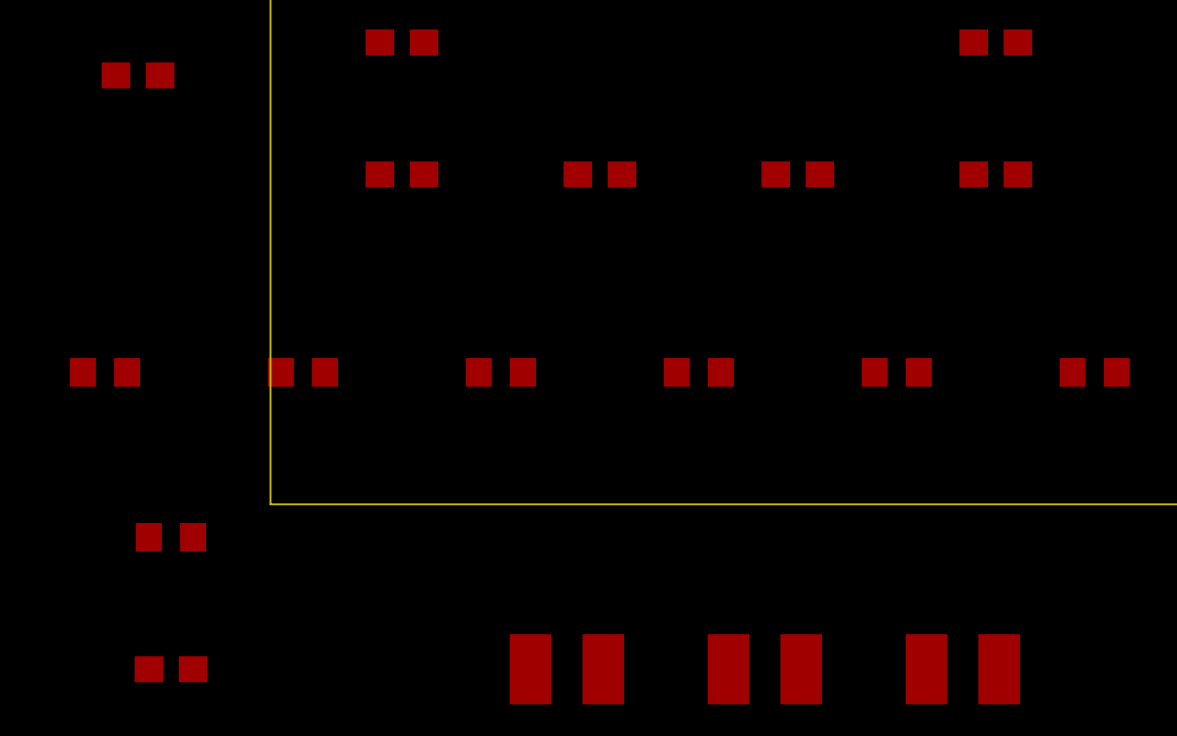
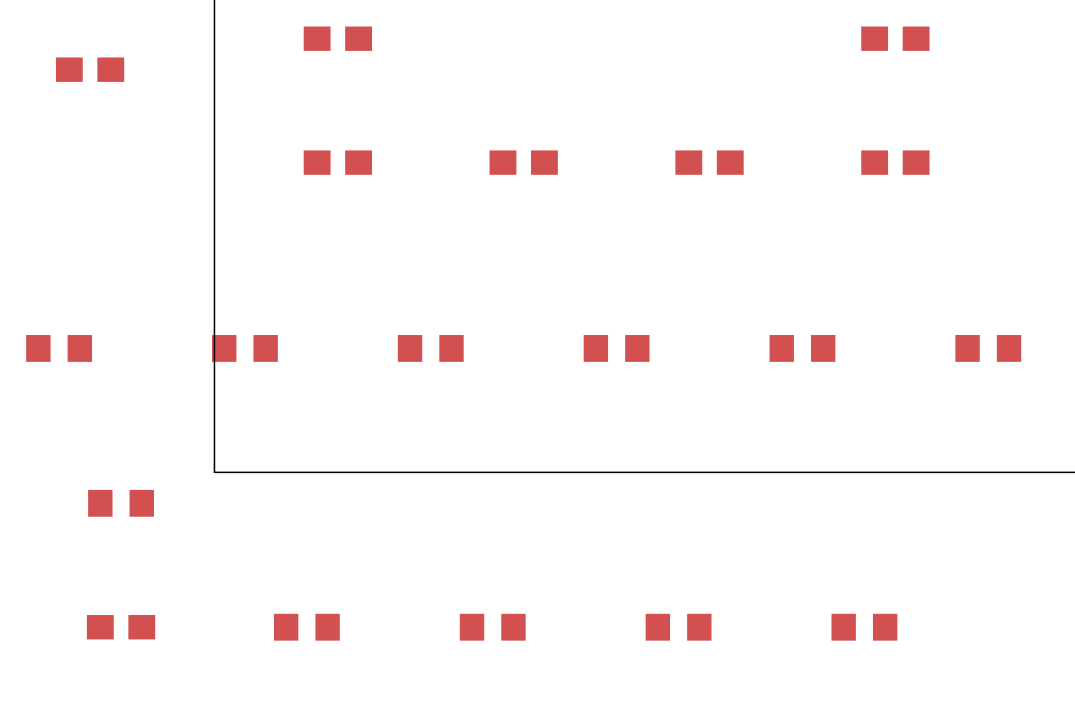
part footprint: [509, 634, 625, 705] -> [459, 613, 526, 641]
part footprint: [707, 634, 822, 705] -> [645, 613, 712, 641]
part footprint: [905, 634, 1020, 705] -> [831, 613, 898, 641]
part: none -> (306, 627)

